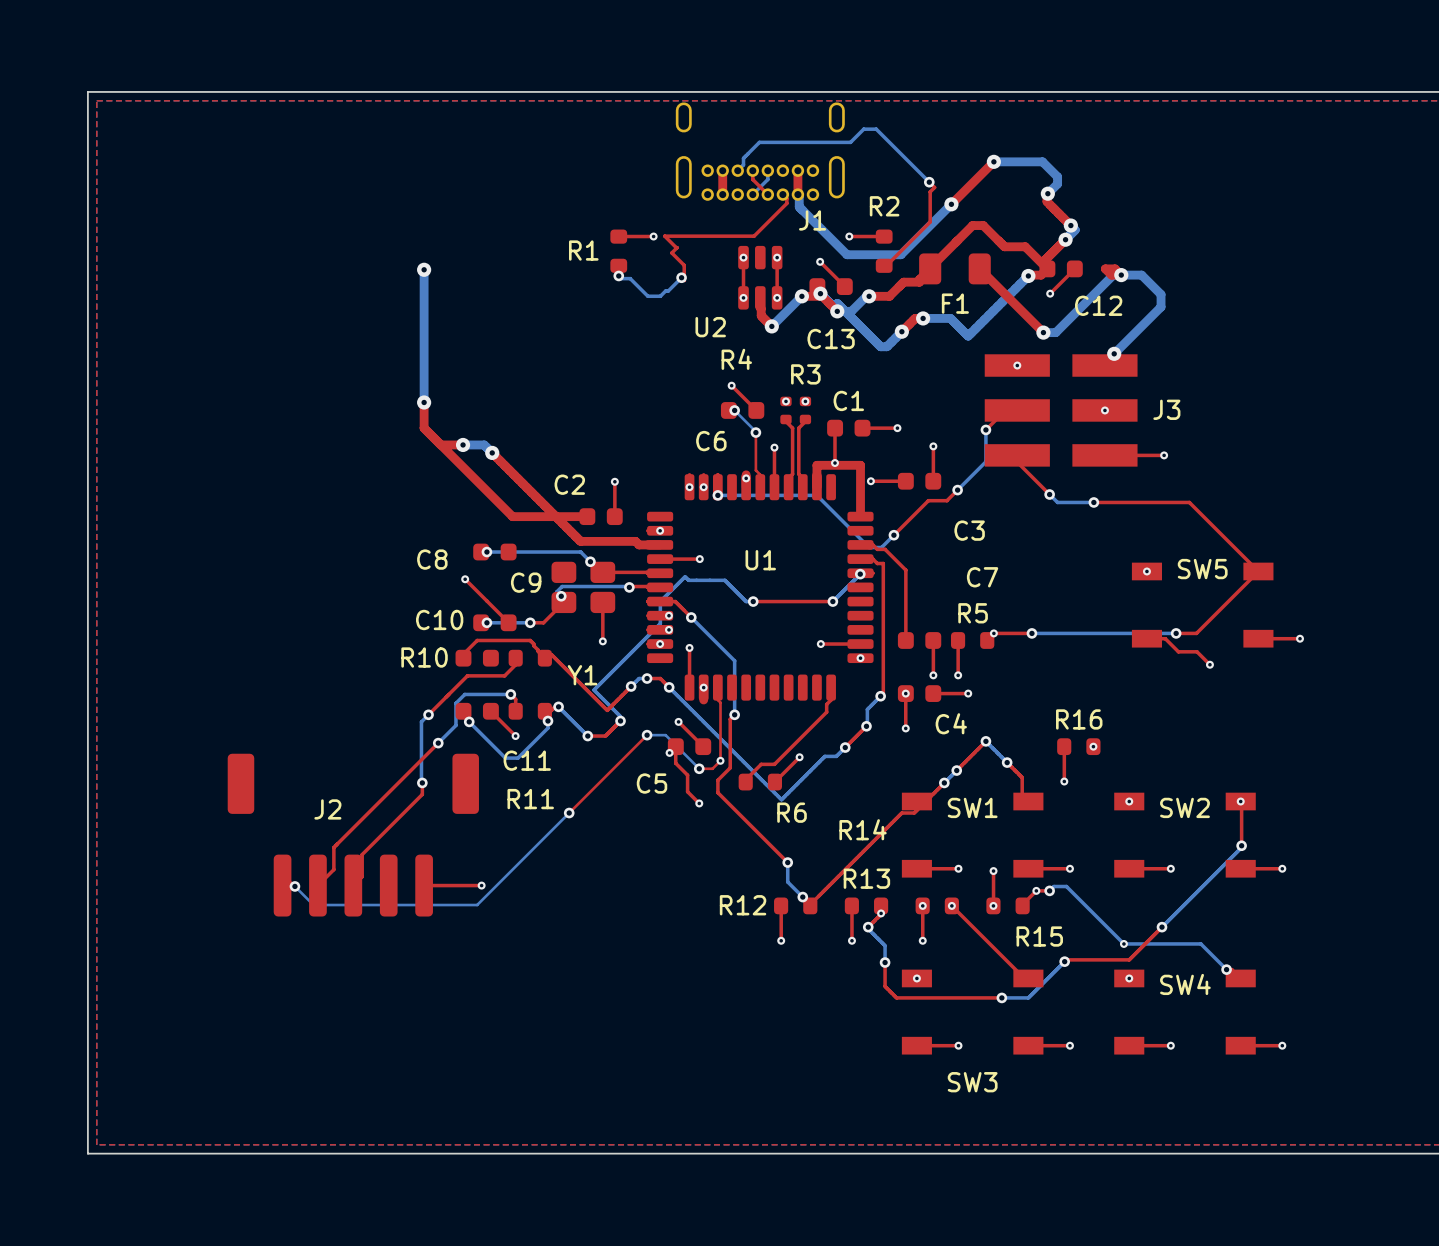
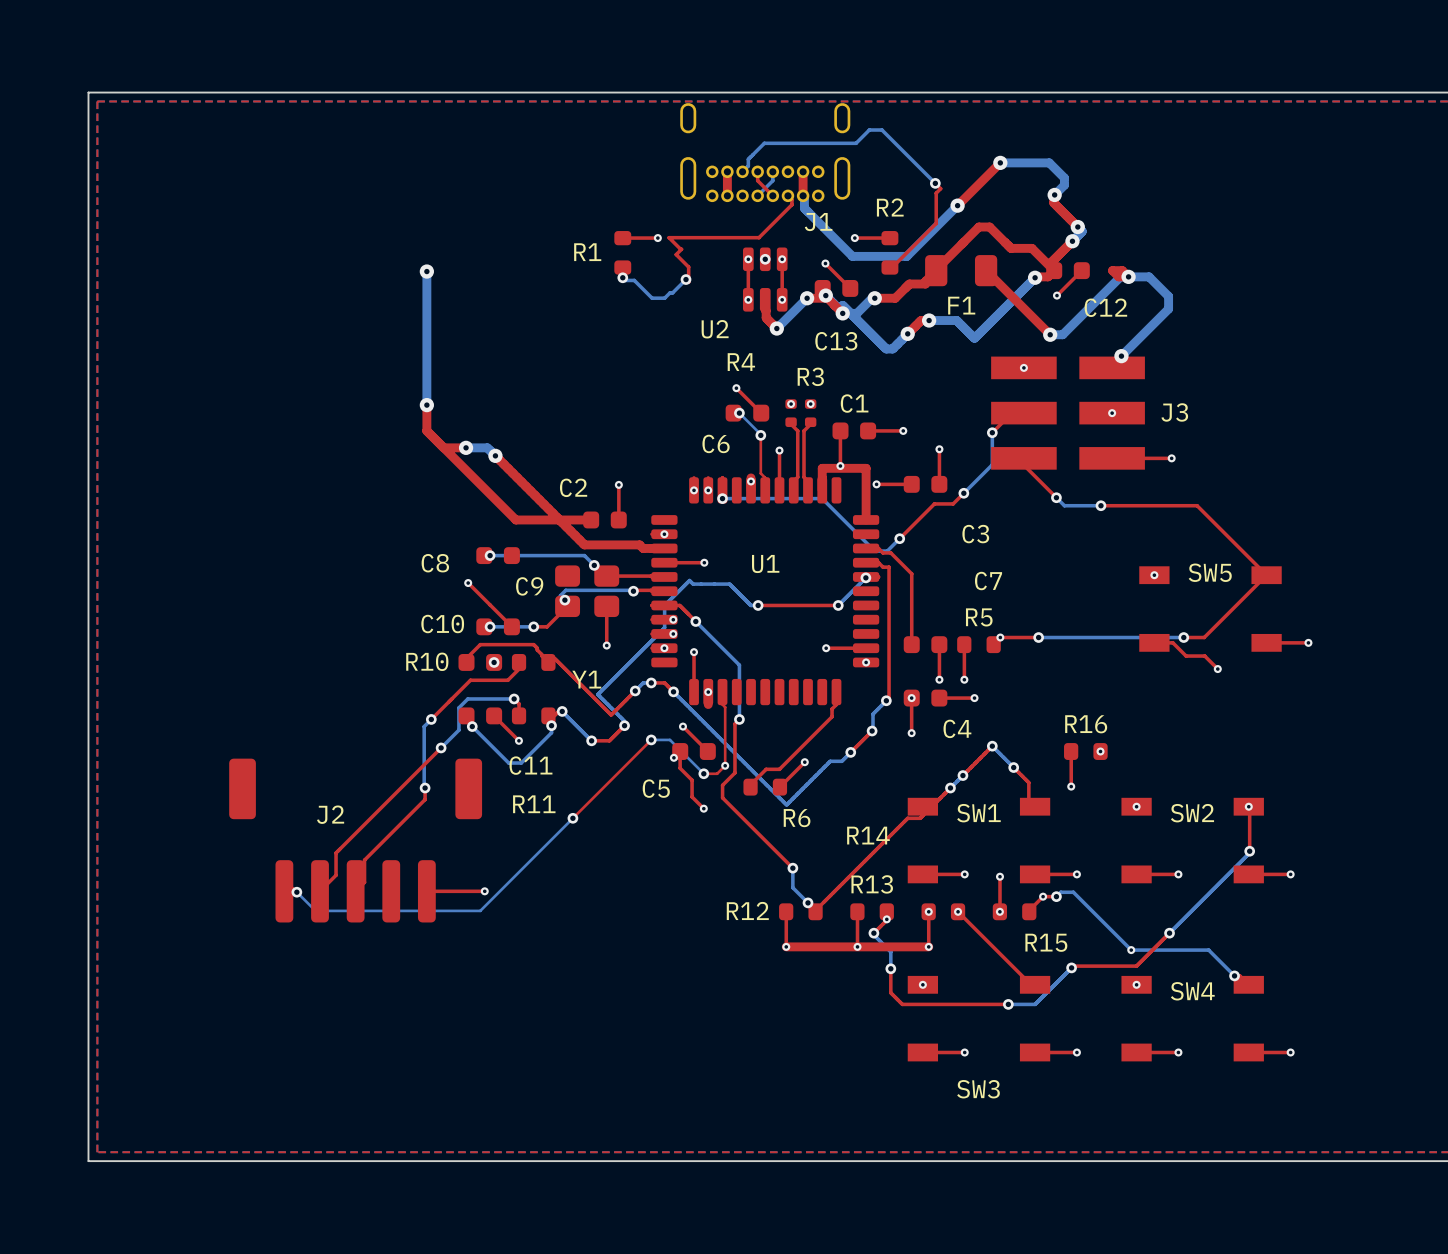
via: none -> (765, 259)
via: none -> (494, 662)
top track: none -> (786, 946) (928, 946)

